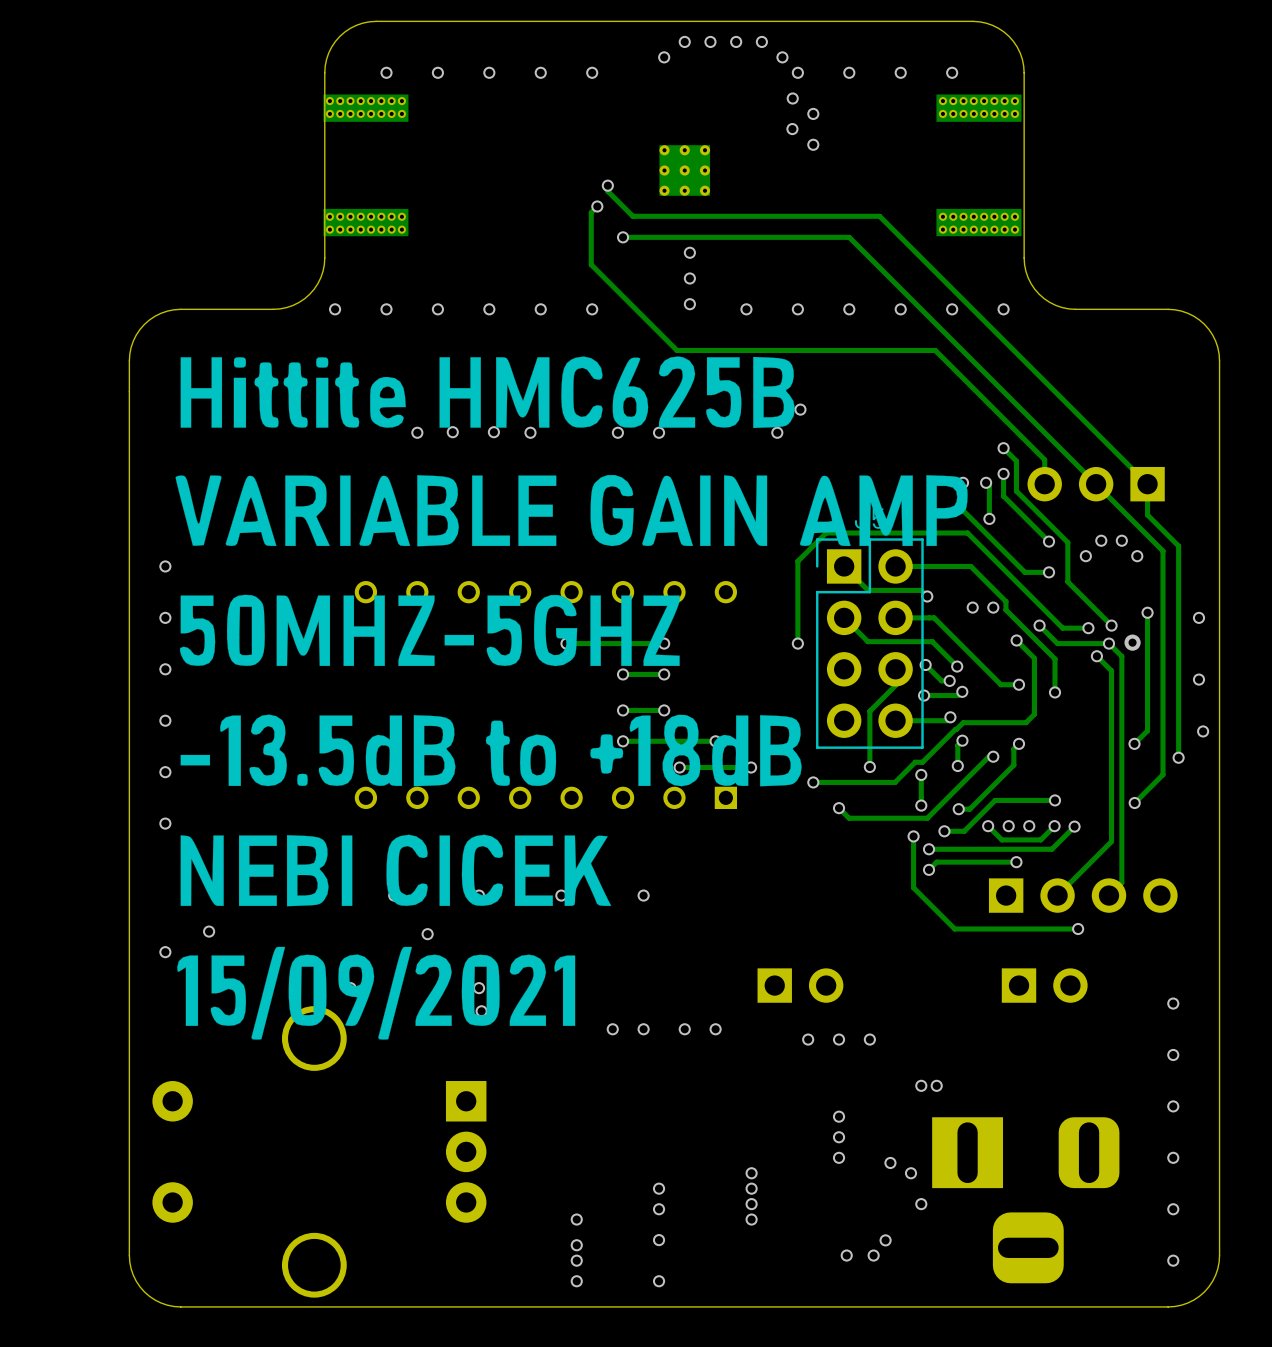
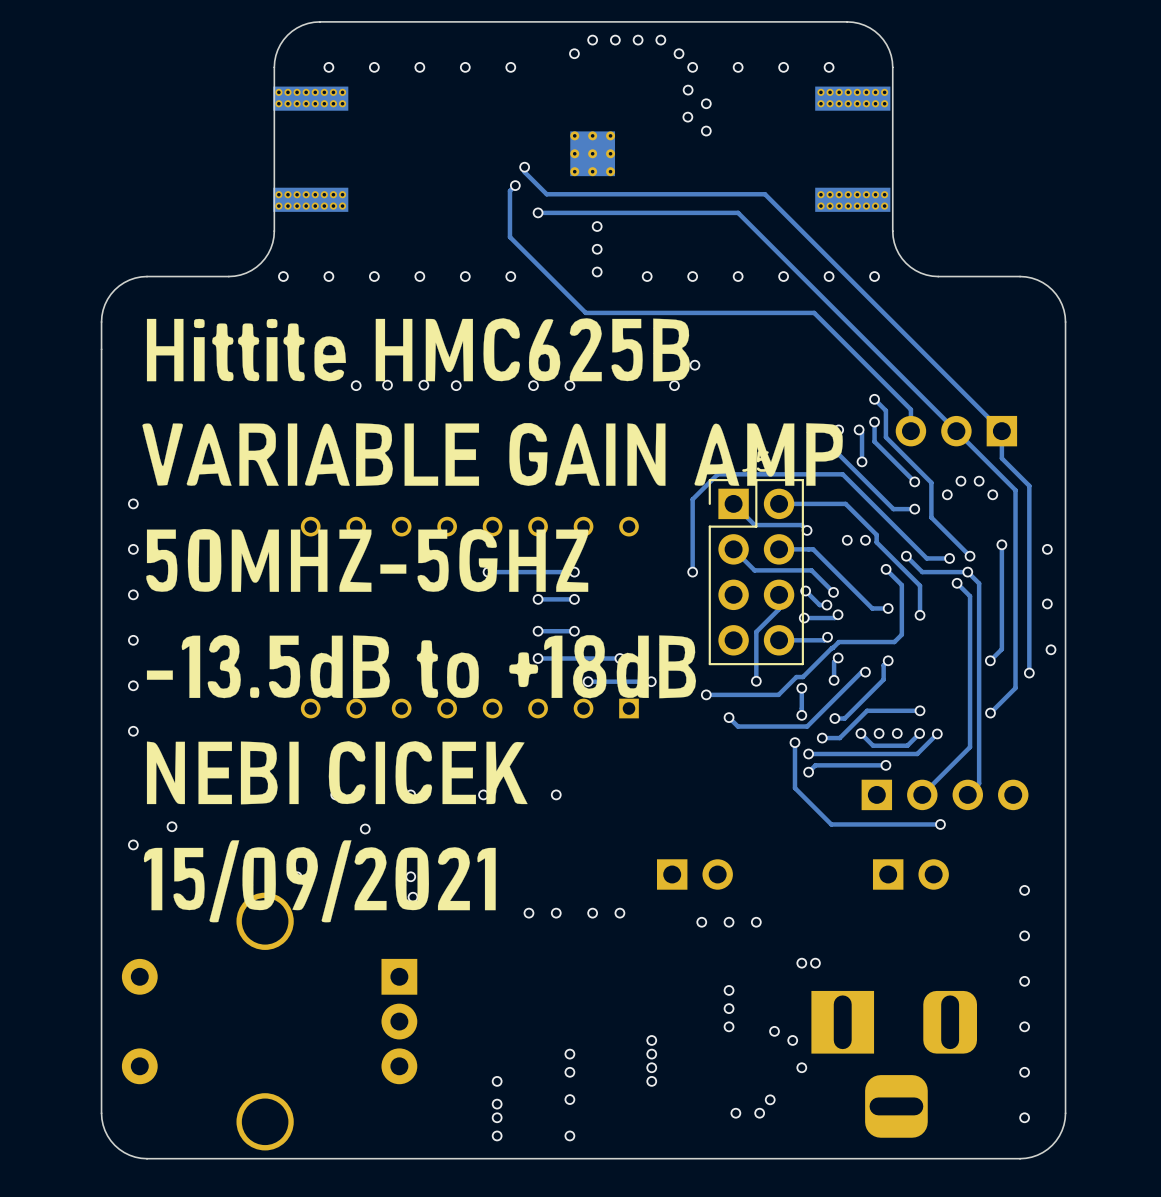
via: (1132, 642) -> none

